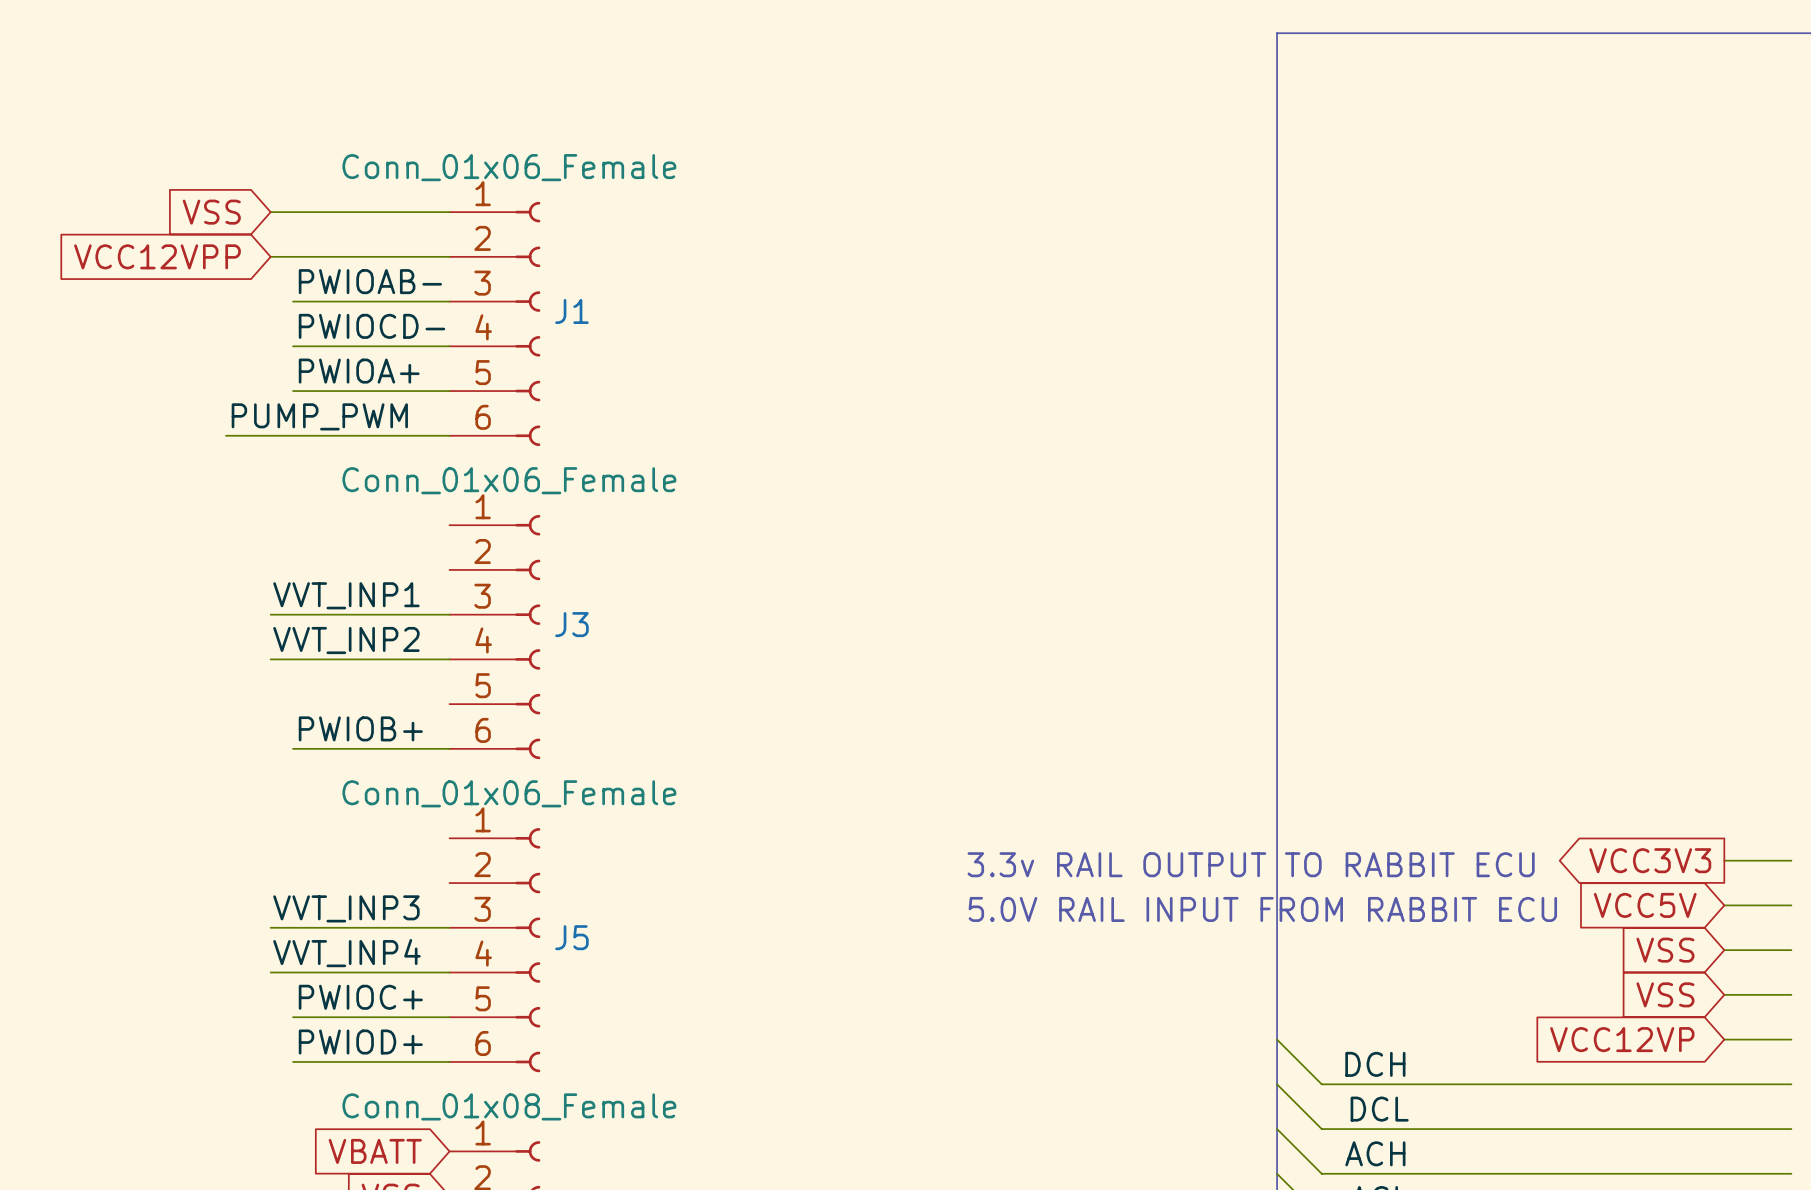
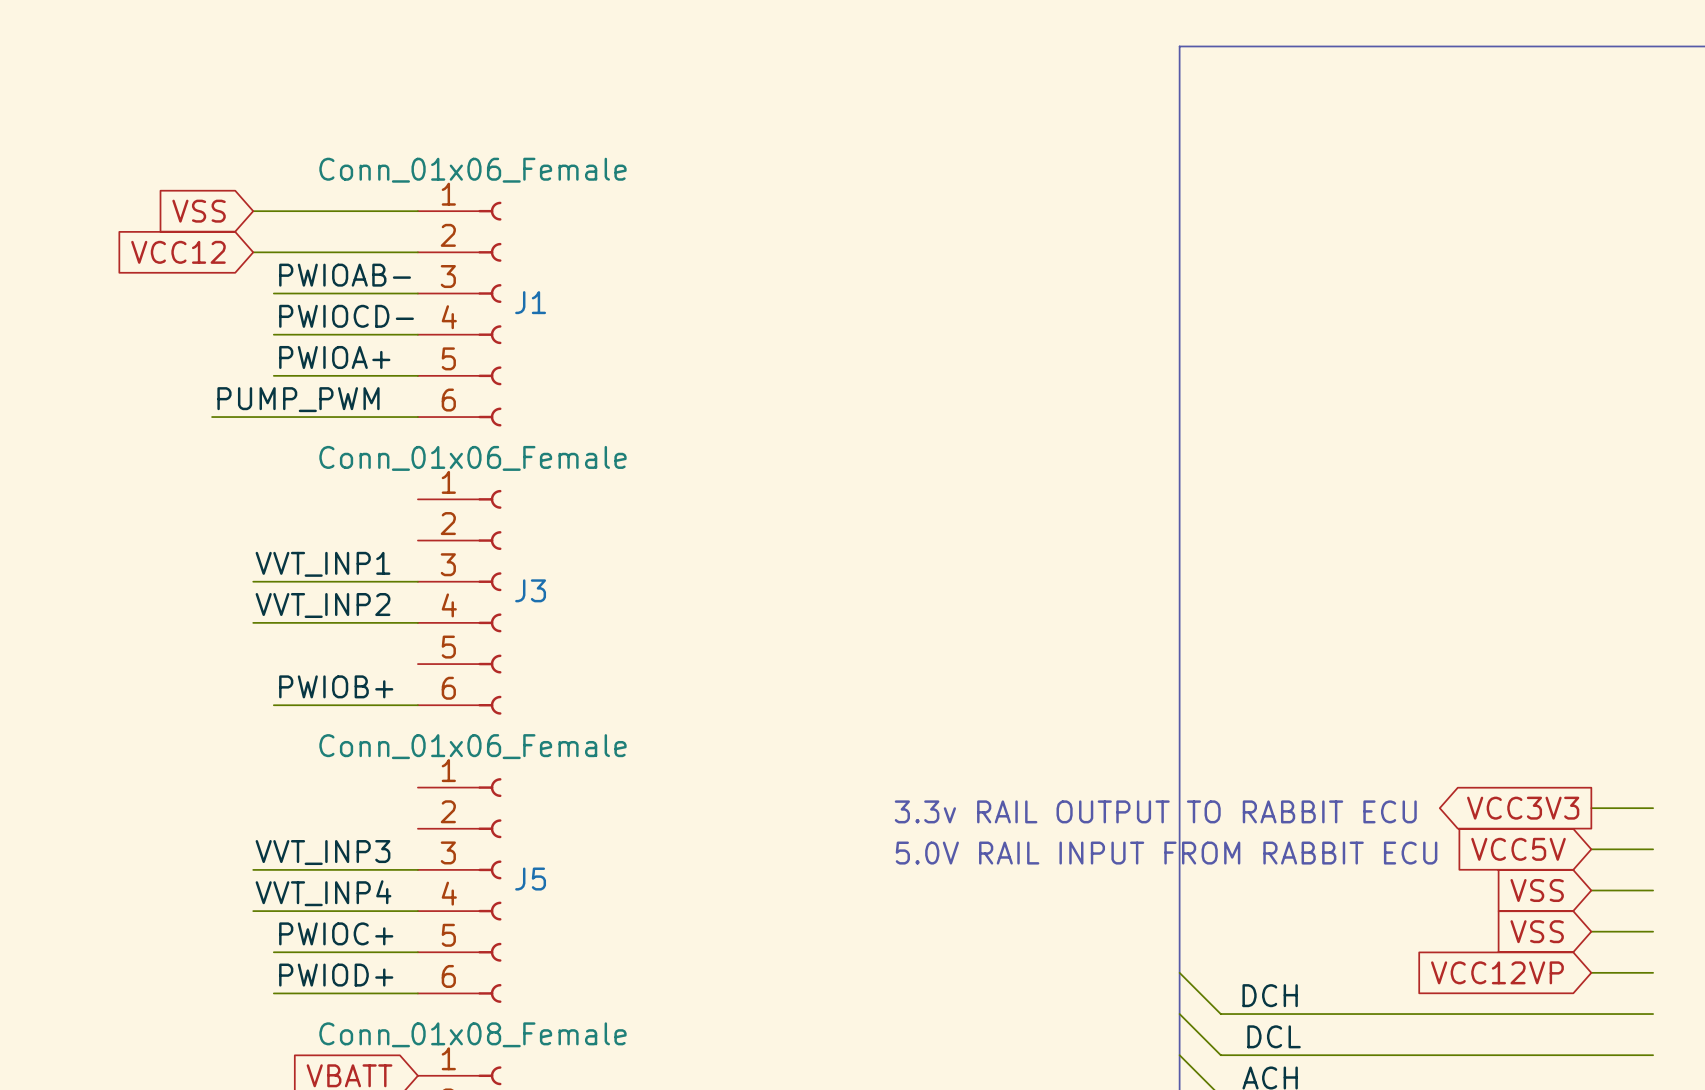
global label: VCC12VPP (157, 256) -> VCC12 (178, 252)

